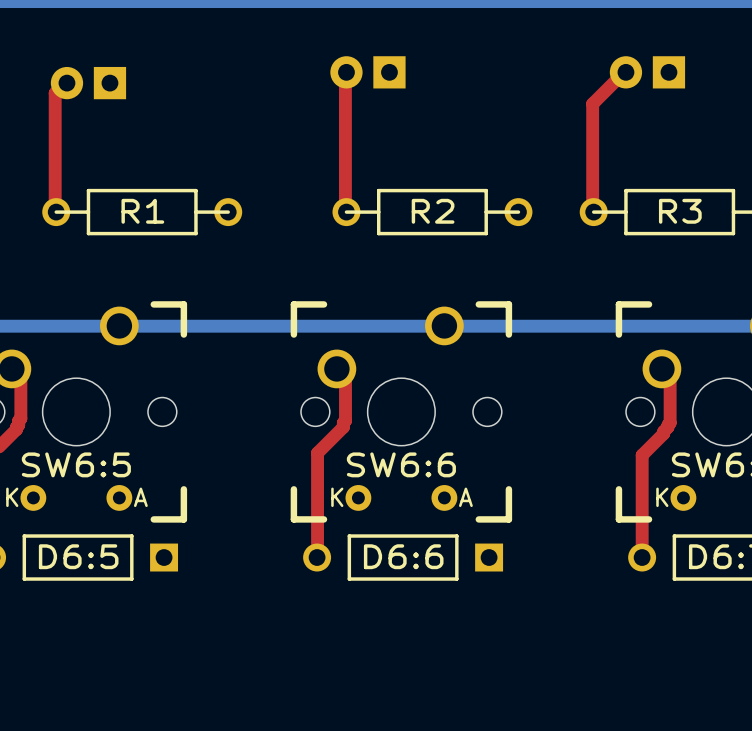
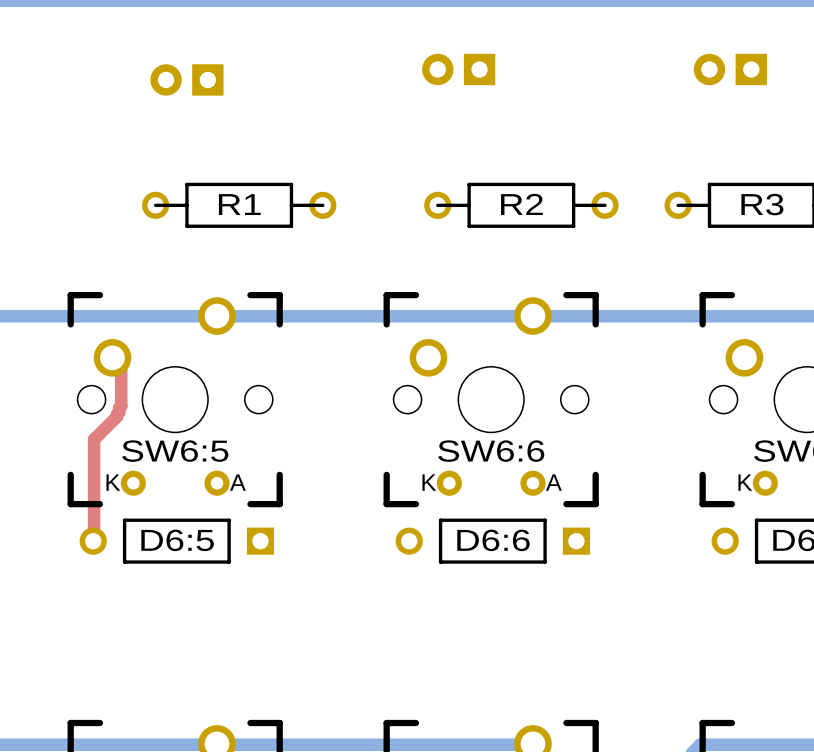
top track: (346, 72) (346, 212) -> none
top track: (625, 72) (592, 103) (593, 212) -> none
top track: (66, 83) (55, 93) (56, 212) -> none
top track: (661, 368) (670, 377) (670, 422) (663, 433) (642, 455) (642, 557) -> none
top track: (336, 369) (345, 377) (345, 420) (343, 427) (317, 453) (317, 557) -> none

